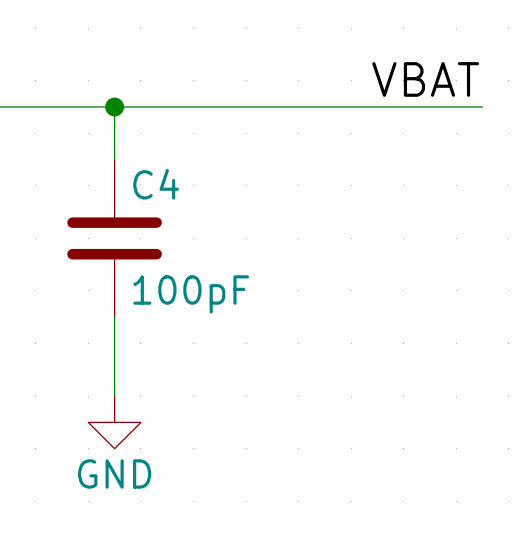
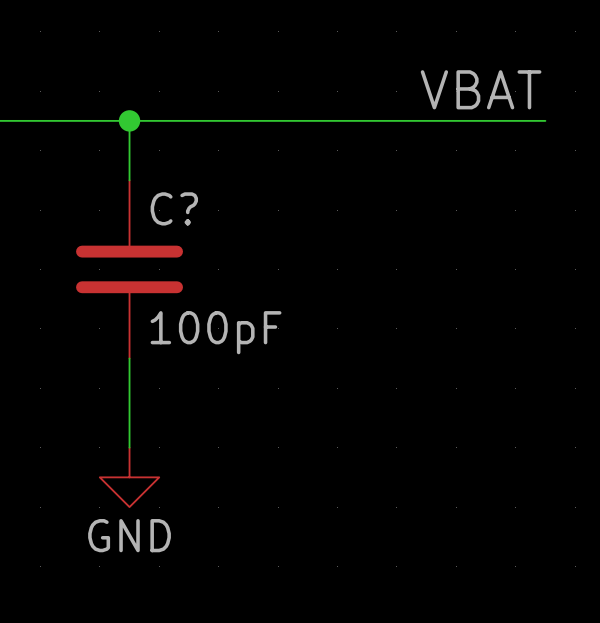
C4 name: C4 (156, 184) -> C? (174, 208)

